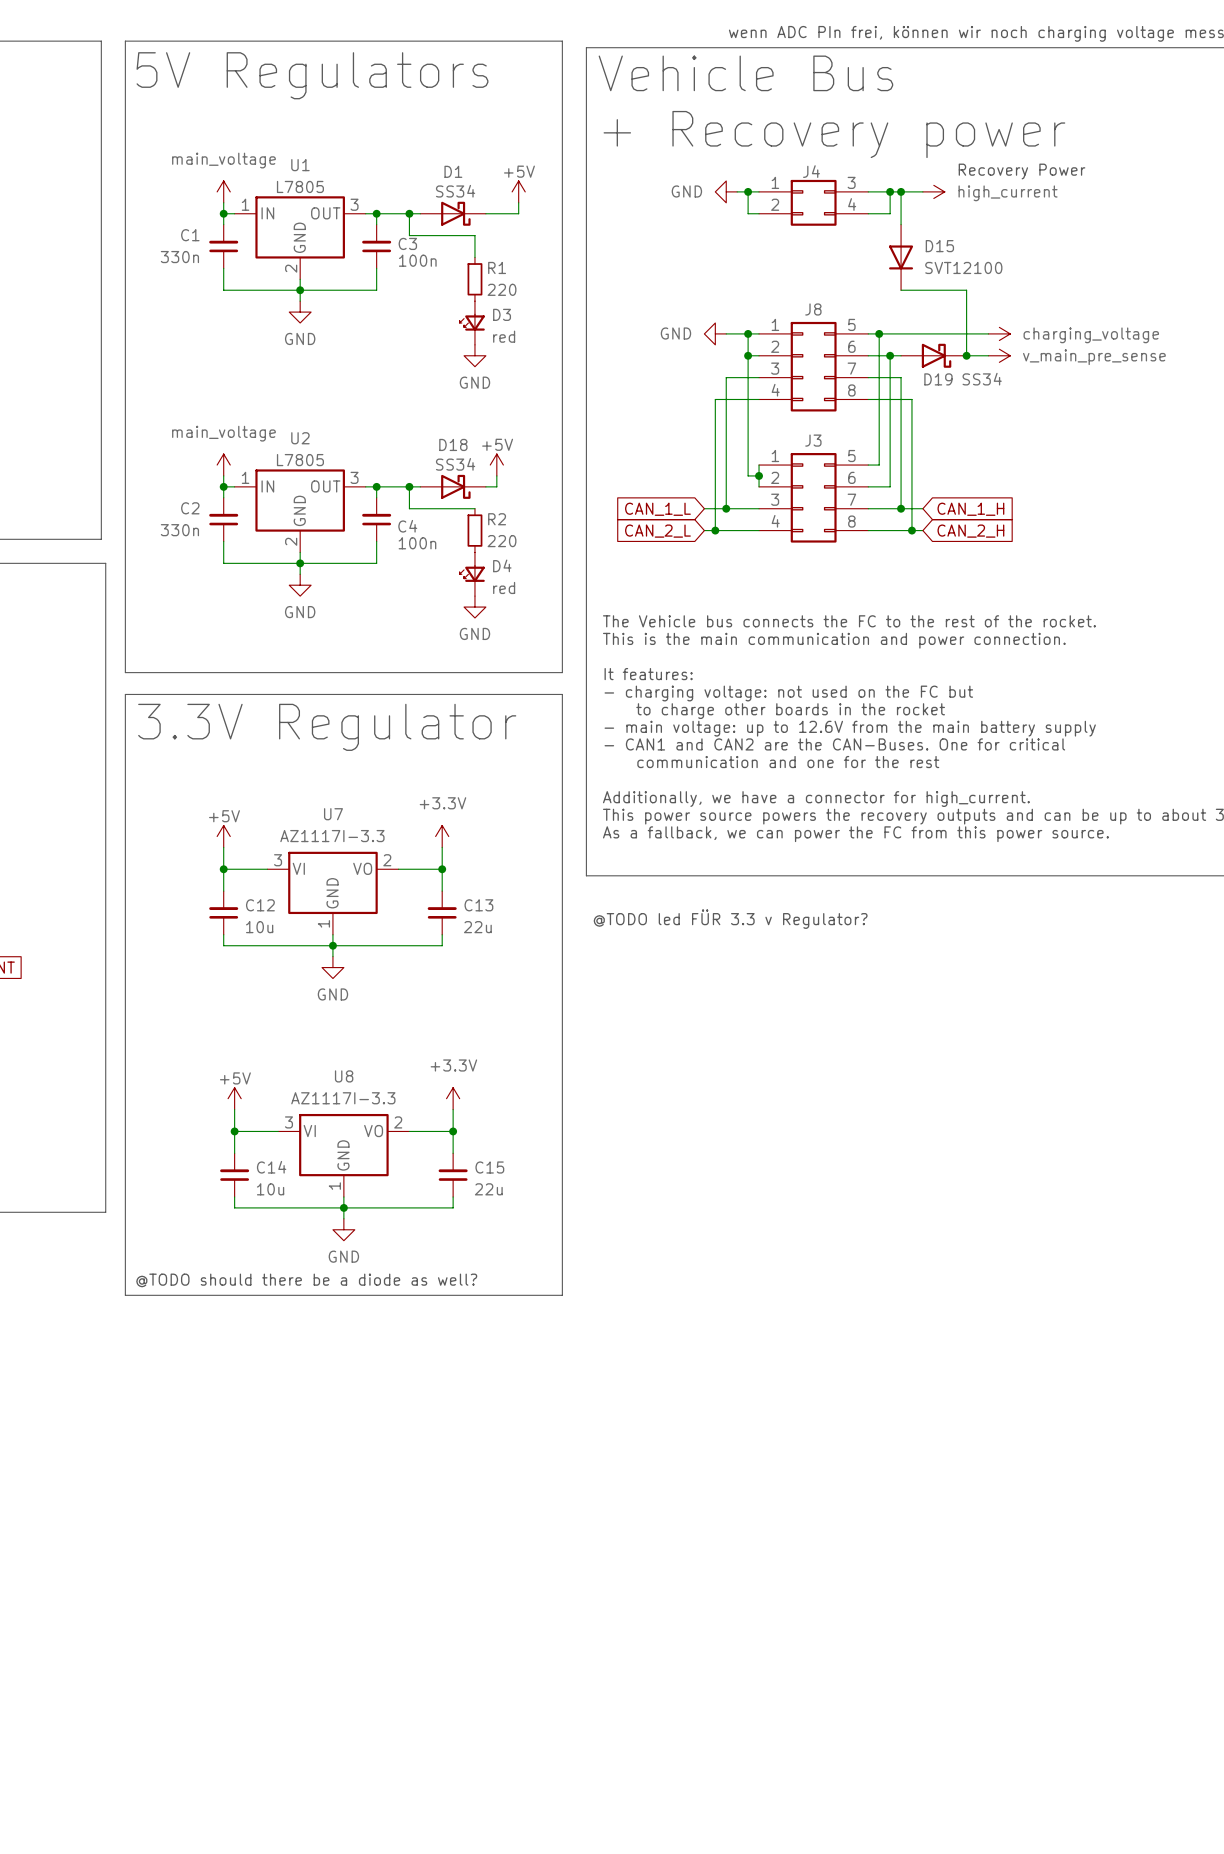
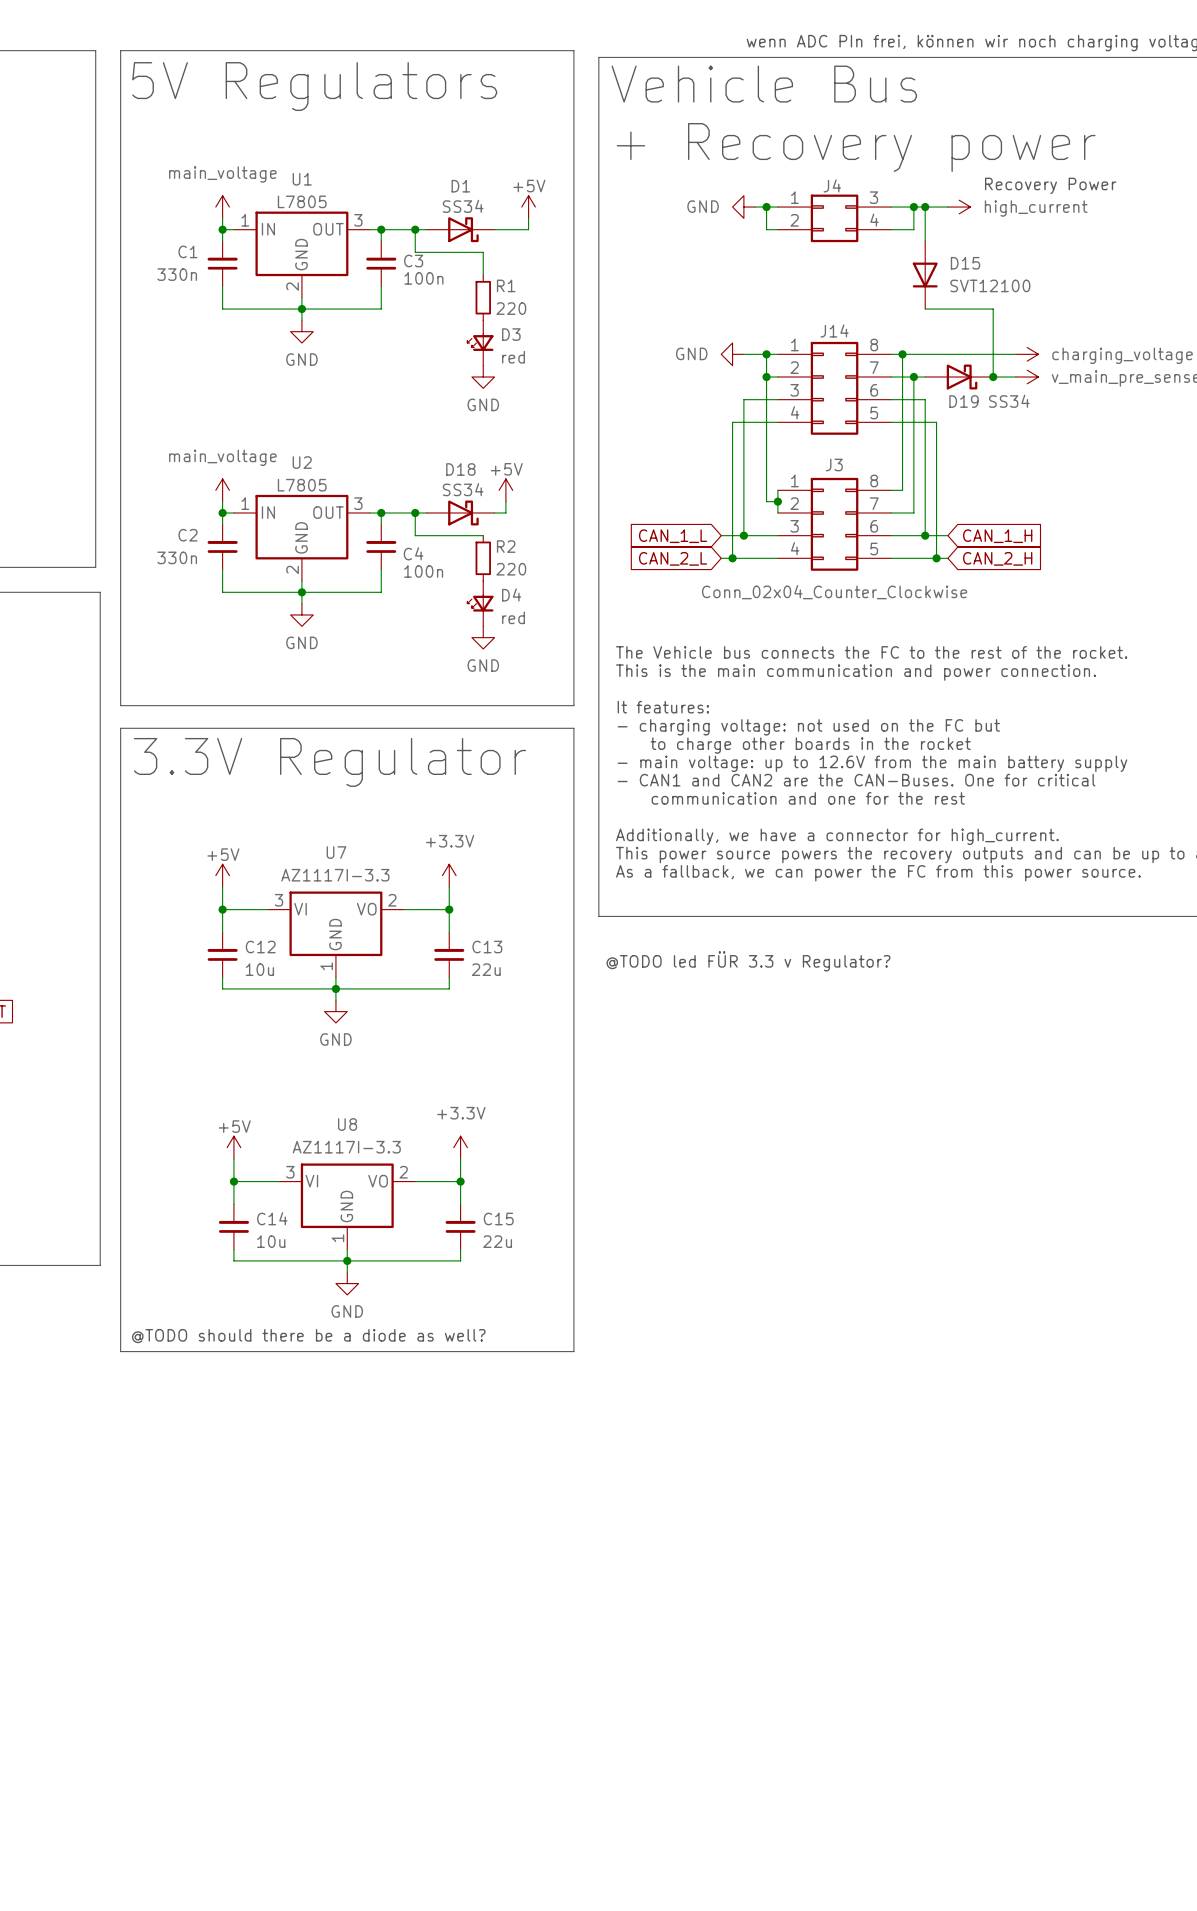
J8 name: J8 (813, 309) -> J14 (834, 330)
J8 pin number: 5 (851, 324) -> 8 (874, 344)
J8 pin number: 6 (851, 346) -> 7 (874, 367)
J8 pin number: 7 (851, 368) -> 6 (874, 390)
J8 pin number: 8 (851, 390) -> 5 (874, 412)
J3 pin number: 5 (851, 456) -> 8 (874, 480)
J3 pin number: 6 (851, 477) -> 7 (874, 503)
J3 pin number: 7 (851, 499) -> 6 (874, 526)
J3 pin number: 8 (851, 521) -> 5 (874, 548)
J3 value: none -> Conn_02x04_Counter_Clockwise (834, 592)

